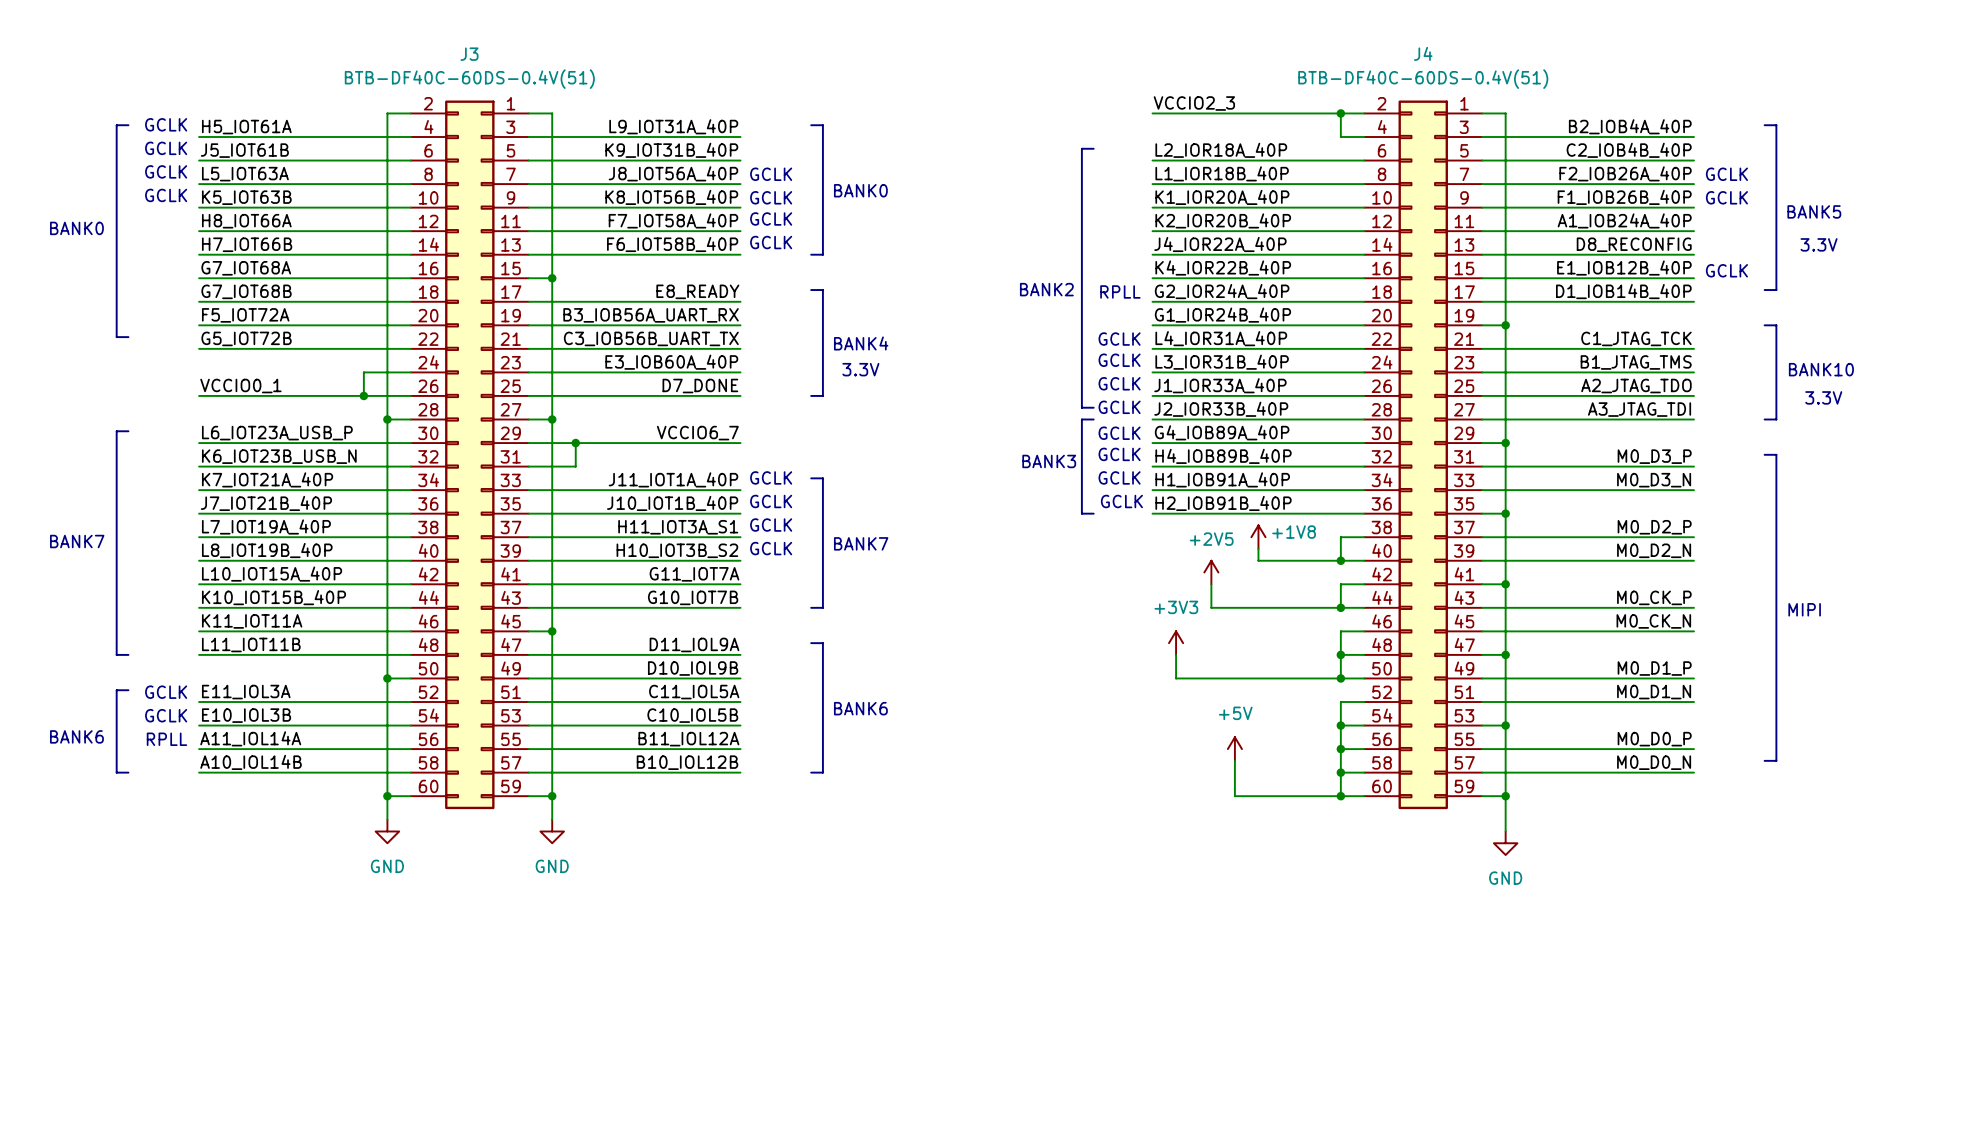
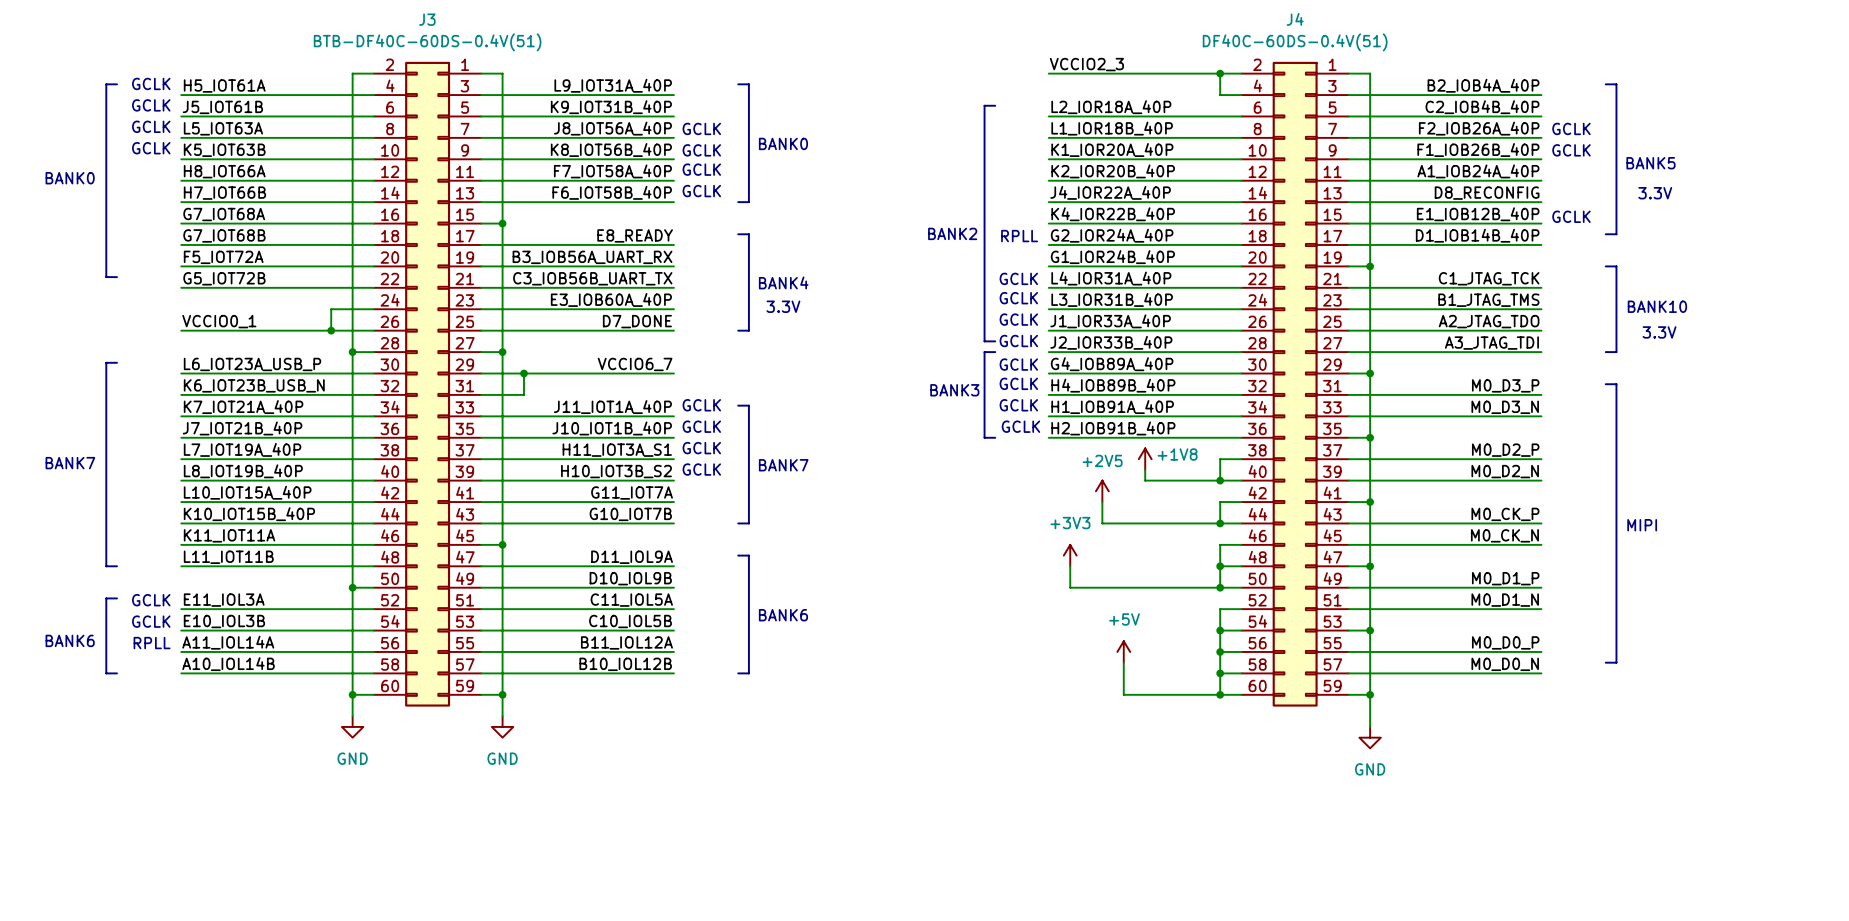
J4 value: BTB-DF40C-60DS-0.4V(51) (1423, 79) -> DF40C-60DS-0.4V(51) (1295, 42)

